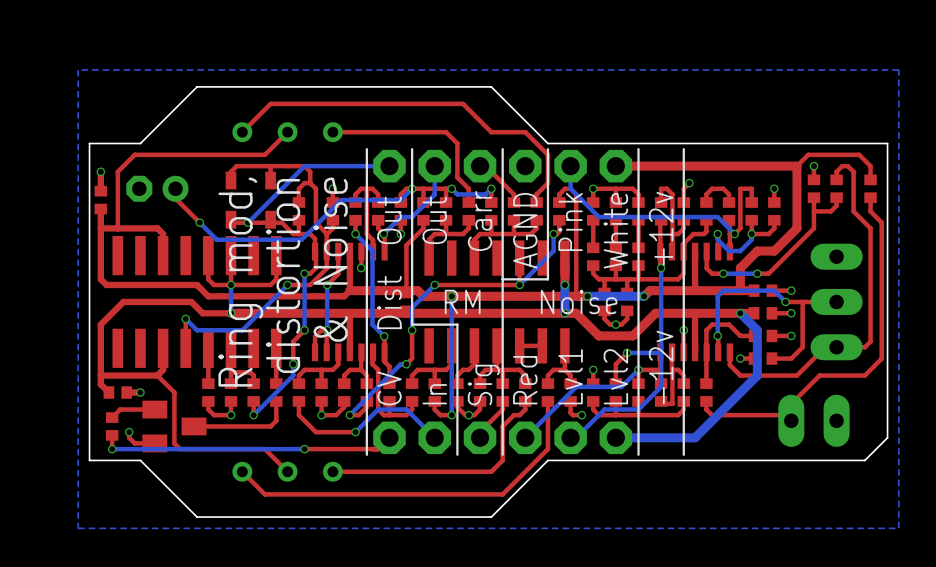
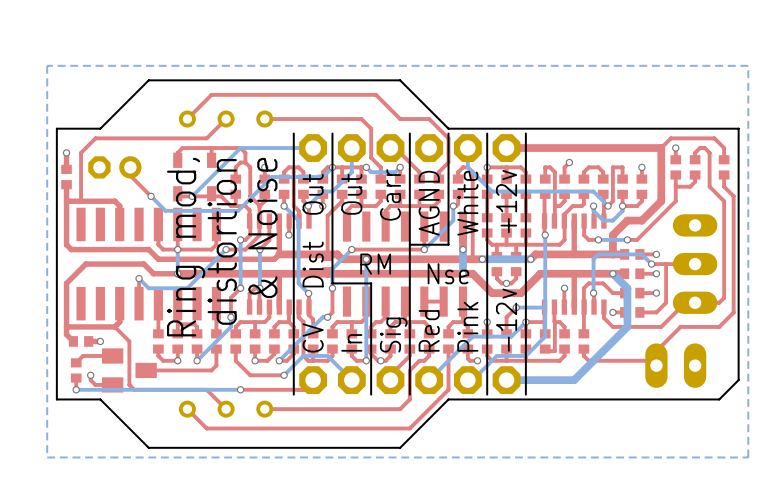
line: (683, 149) (683, 454) -> (487, 133) (487, 394)
text: Pink (570, 221) -> White (467, 203)
text: +12v (661, 228) -> none
text: White (615, 230) -> +12v (506, 201)
text: Noise (579, 301) -> Nse (448, 273)
text: -12v (661, 367) -> none
text: Lvl1 (570, 376) -> Pink (467, 326)
text: Lvl2 (615, 376) -> -12v (506, 320)

